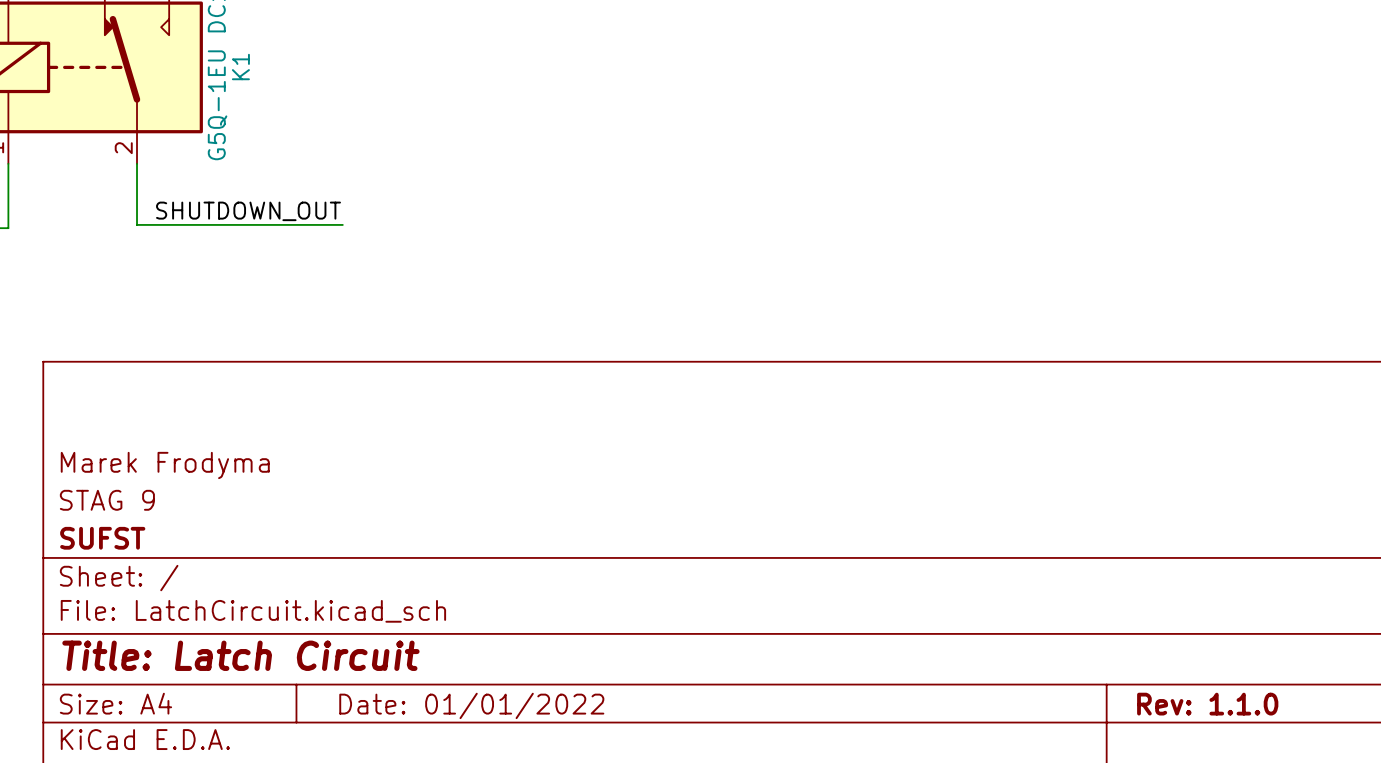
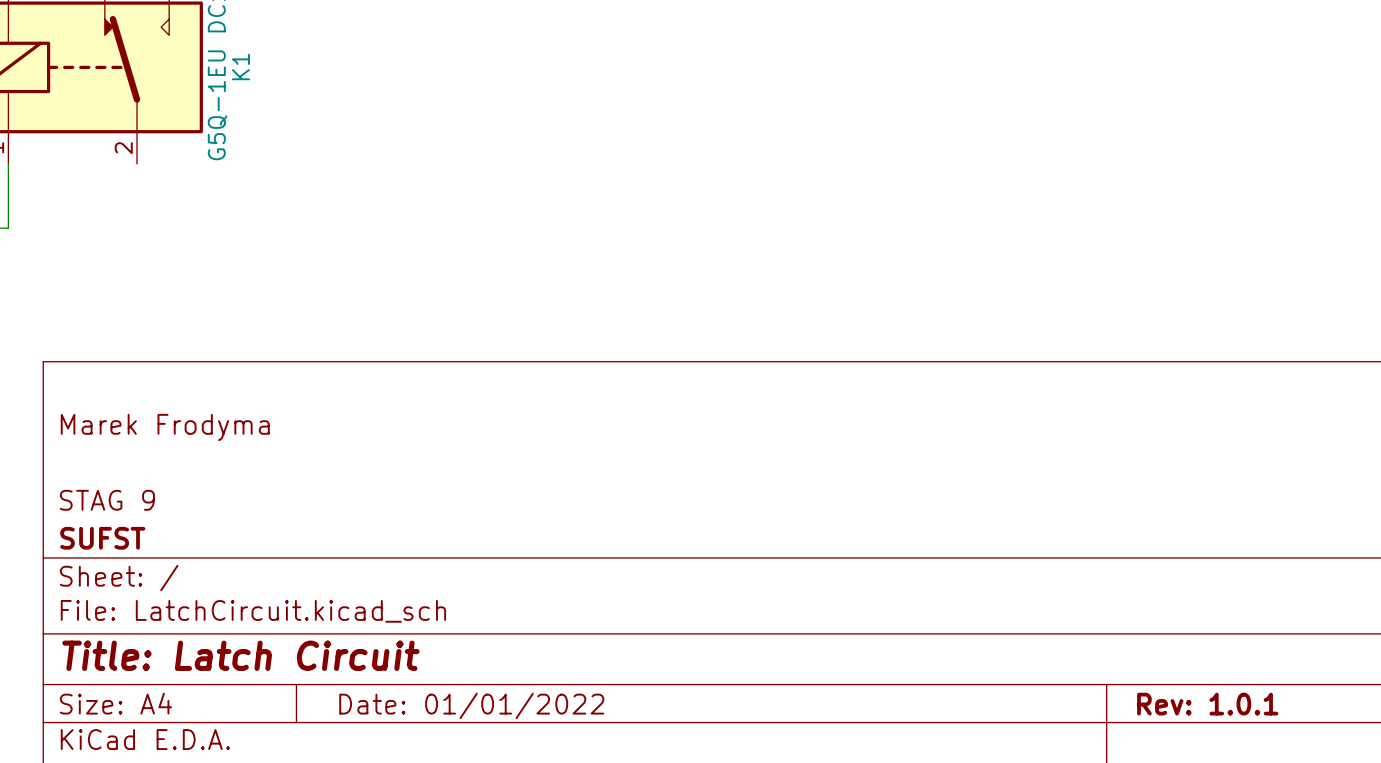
wire: (137, 163) (137, 224) (342, 224) -> none
label: SHUTDOWN_OUT (248, 211) -> none
title block position: Marek Frodyma (165, 465) -> Marek Frodyma (165, 427)
title block: Rev: 1.1.0 (1207, 704) -> Rev: 1.0.1 (1207, 704)

